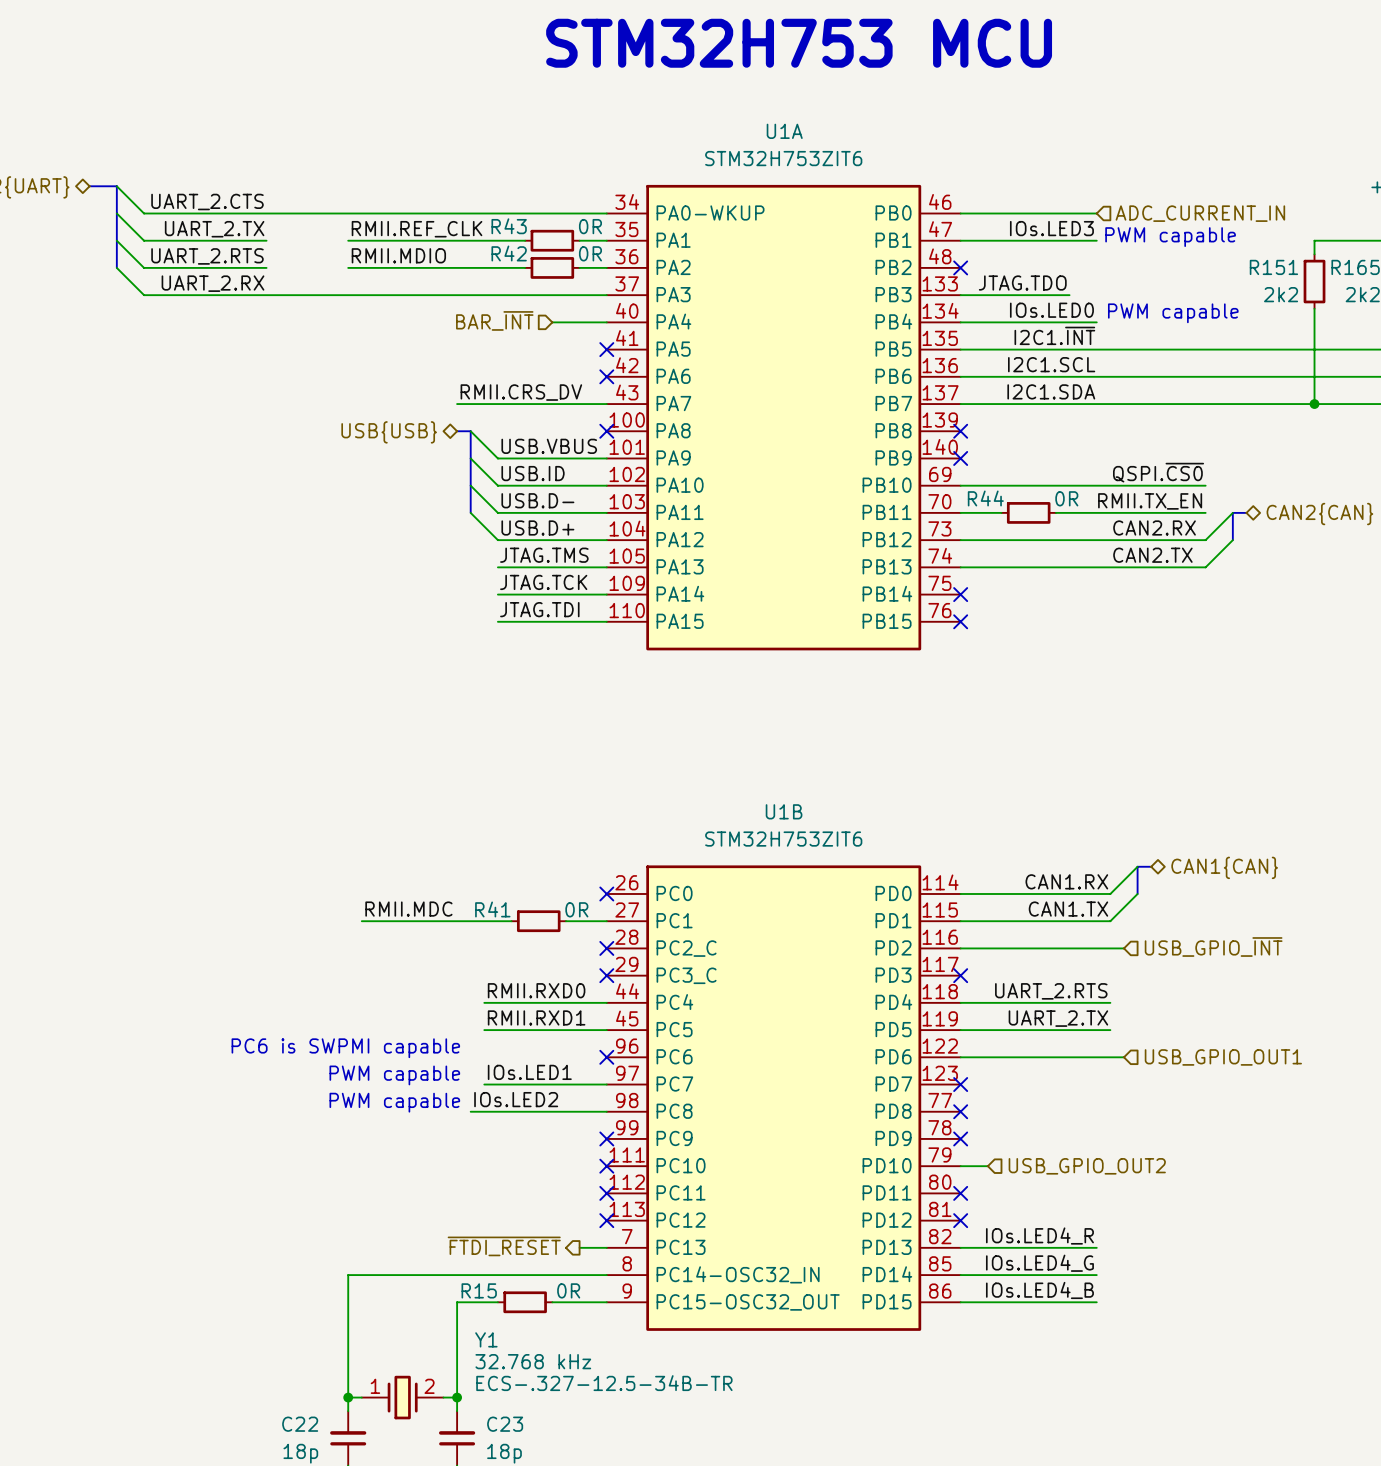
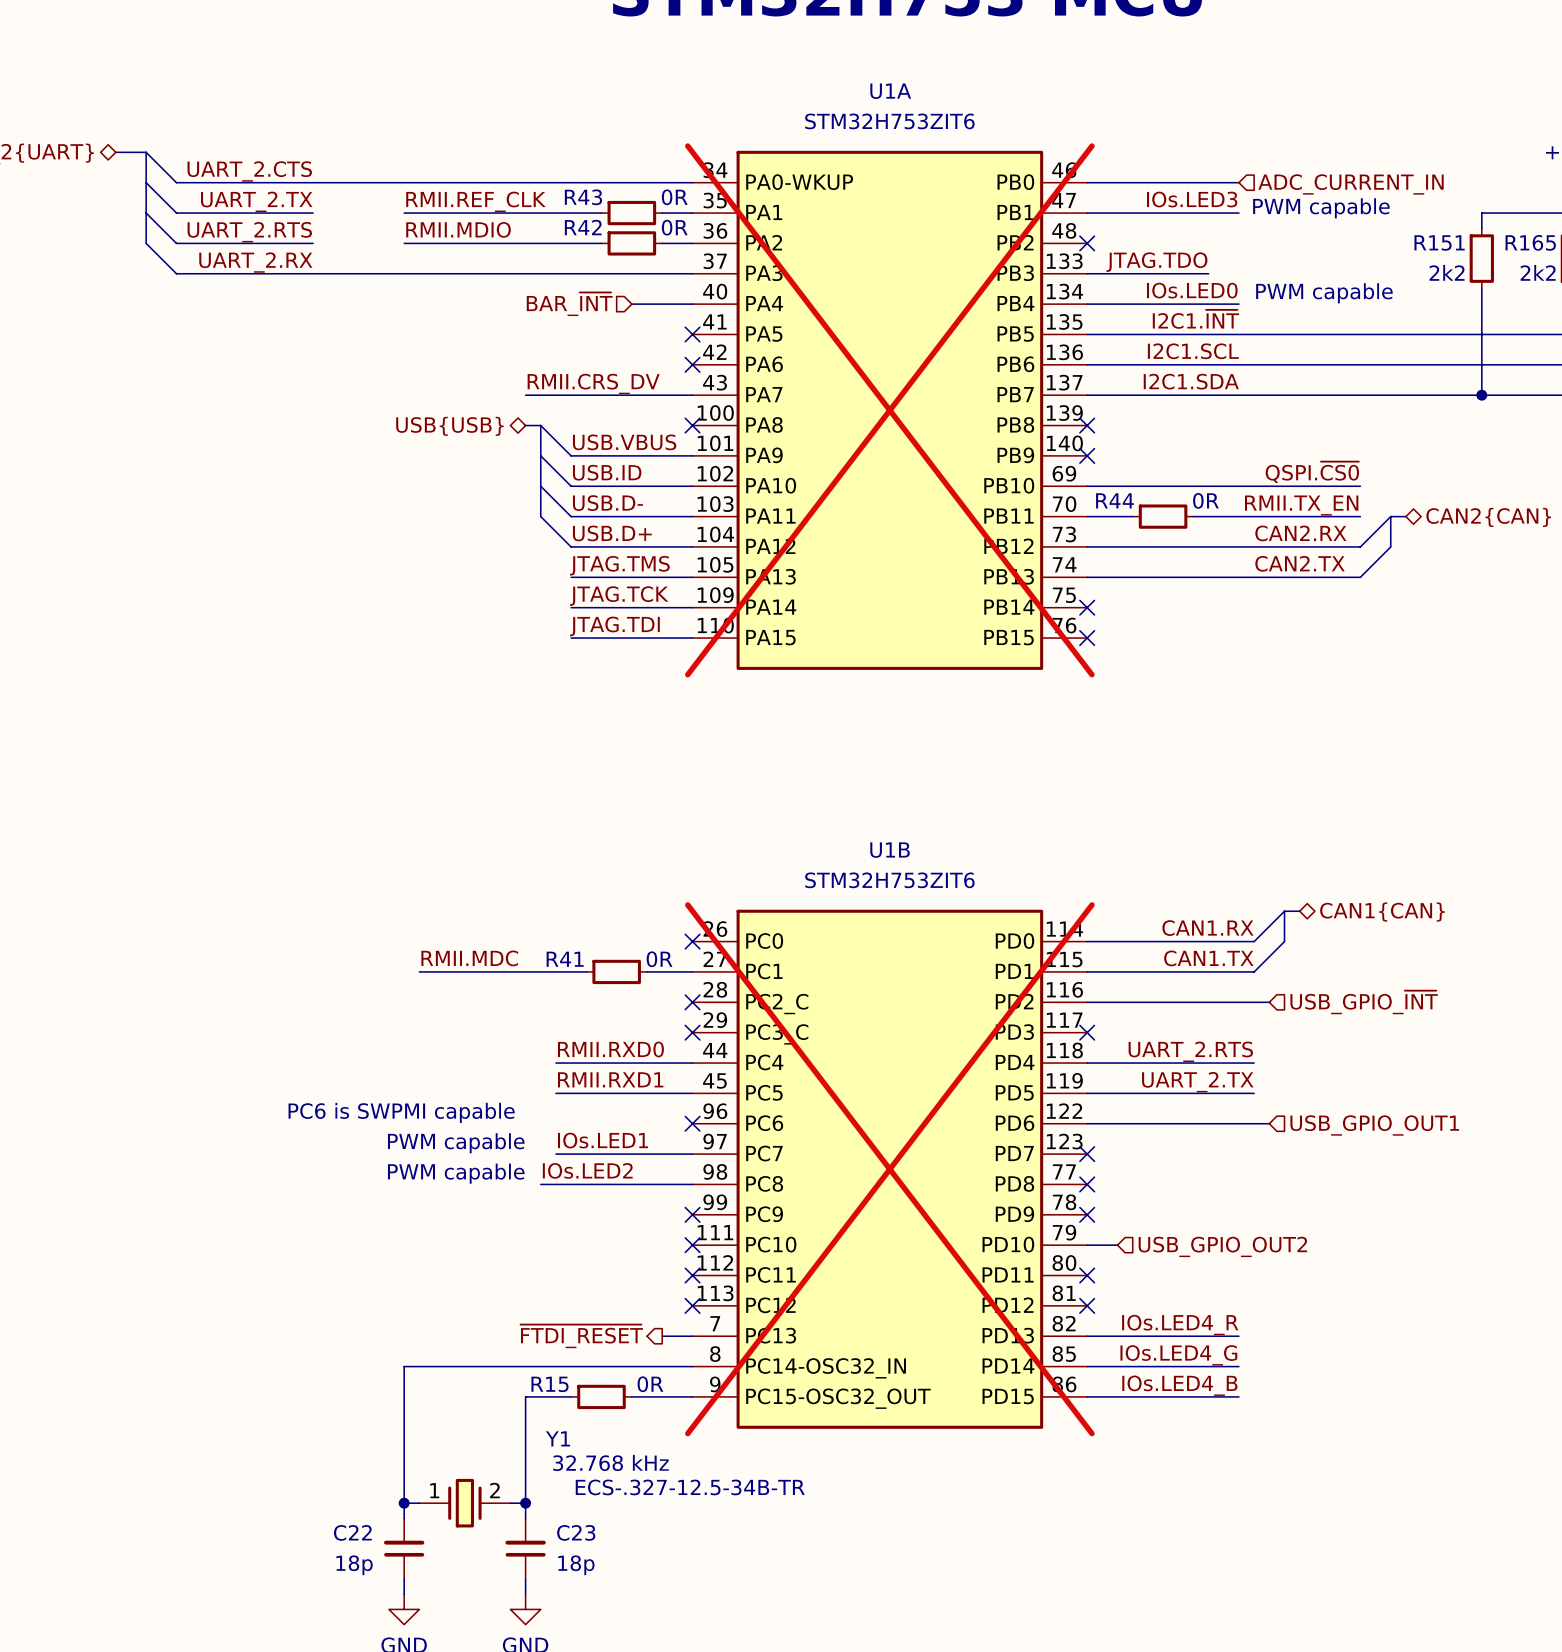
U1A do-not-place cross: none -> (889, 410)
U1B do-not-place cross: none -> (889, 1169)

